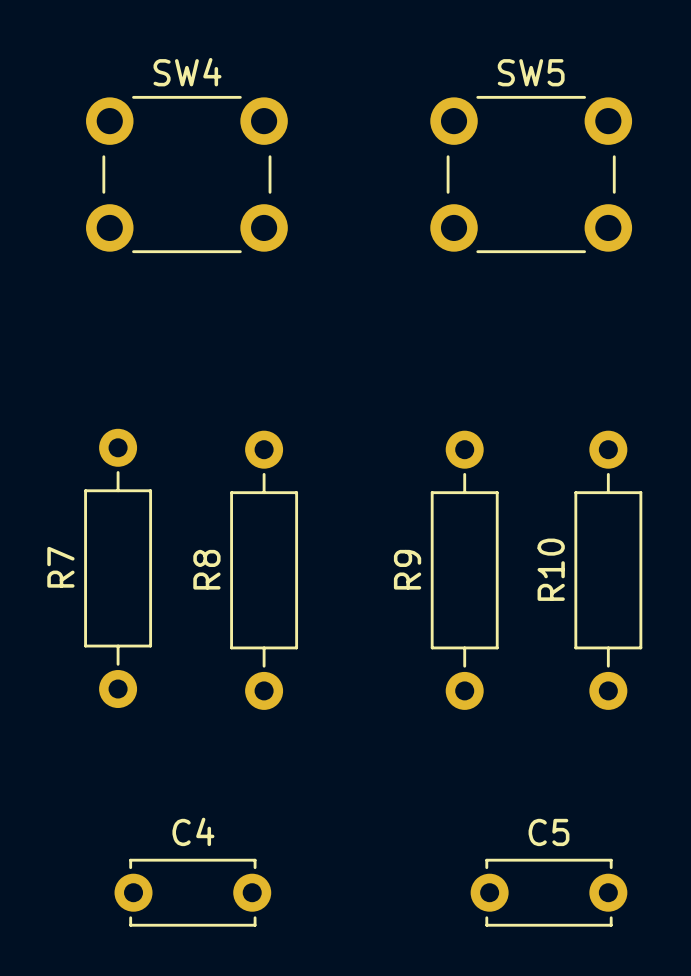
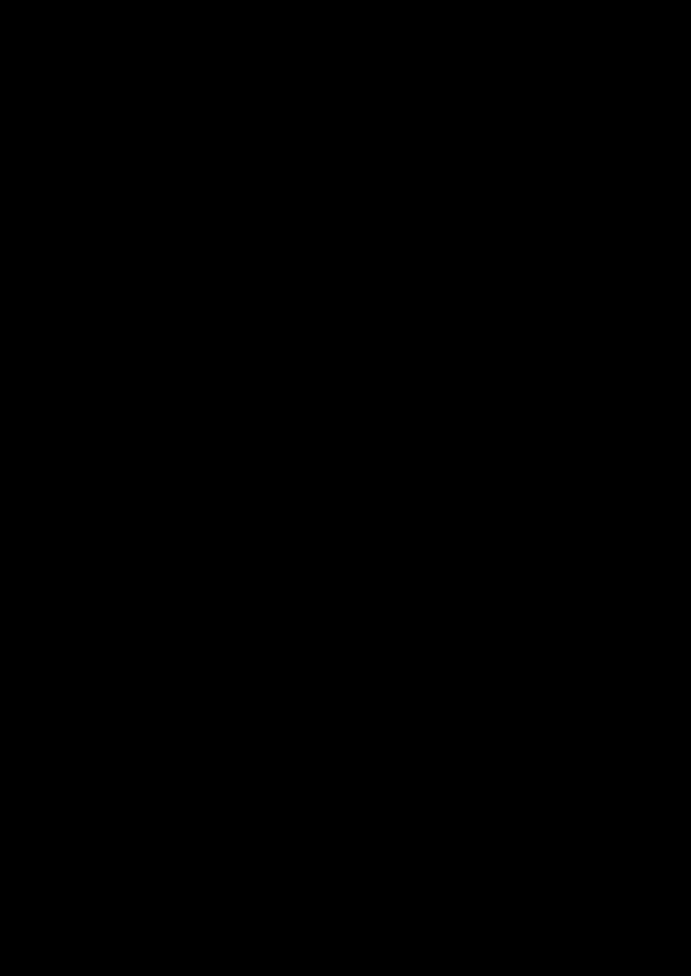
SW4: (186, 174) -> none
SW5: (531, 174) -> none
R7: (118, 568) -> none
R8: (264, 570) -> none
R9: (464, 570) -> none
R10: (608, 570) -> none
C4: (192, 892) -> none
C5: (548, 892) -> none

